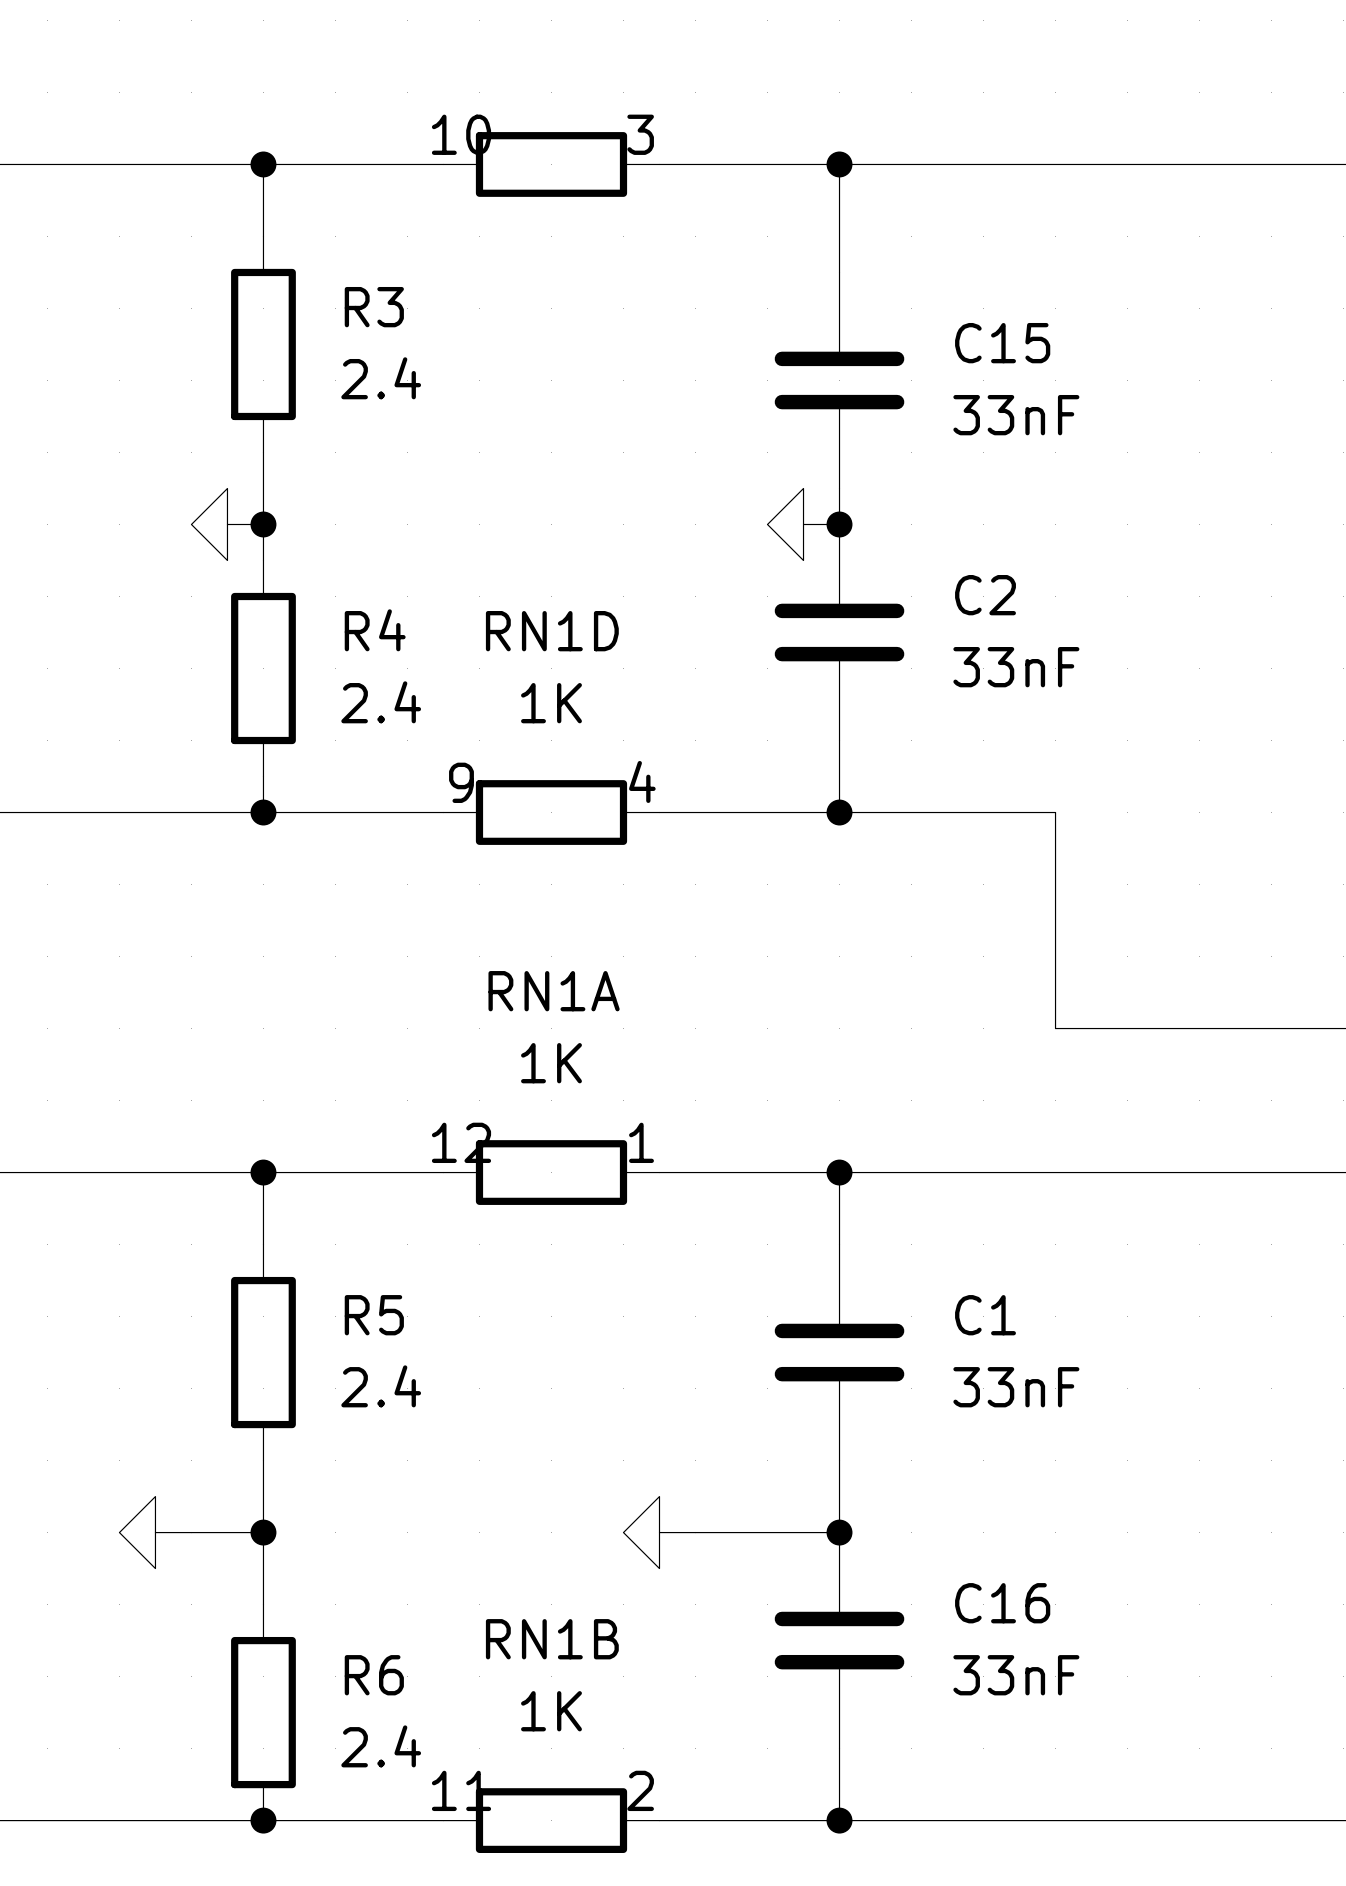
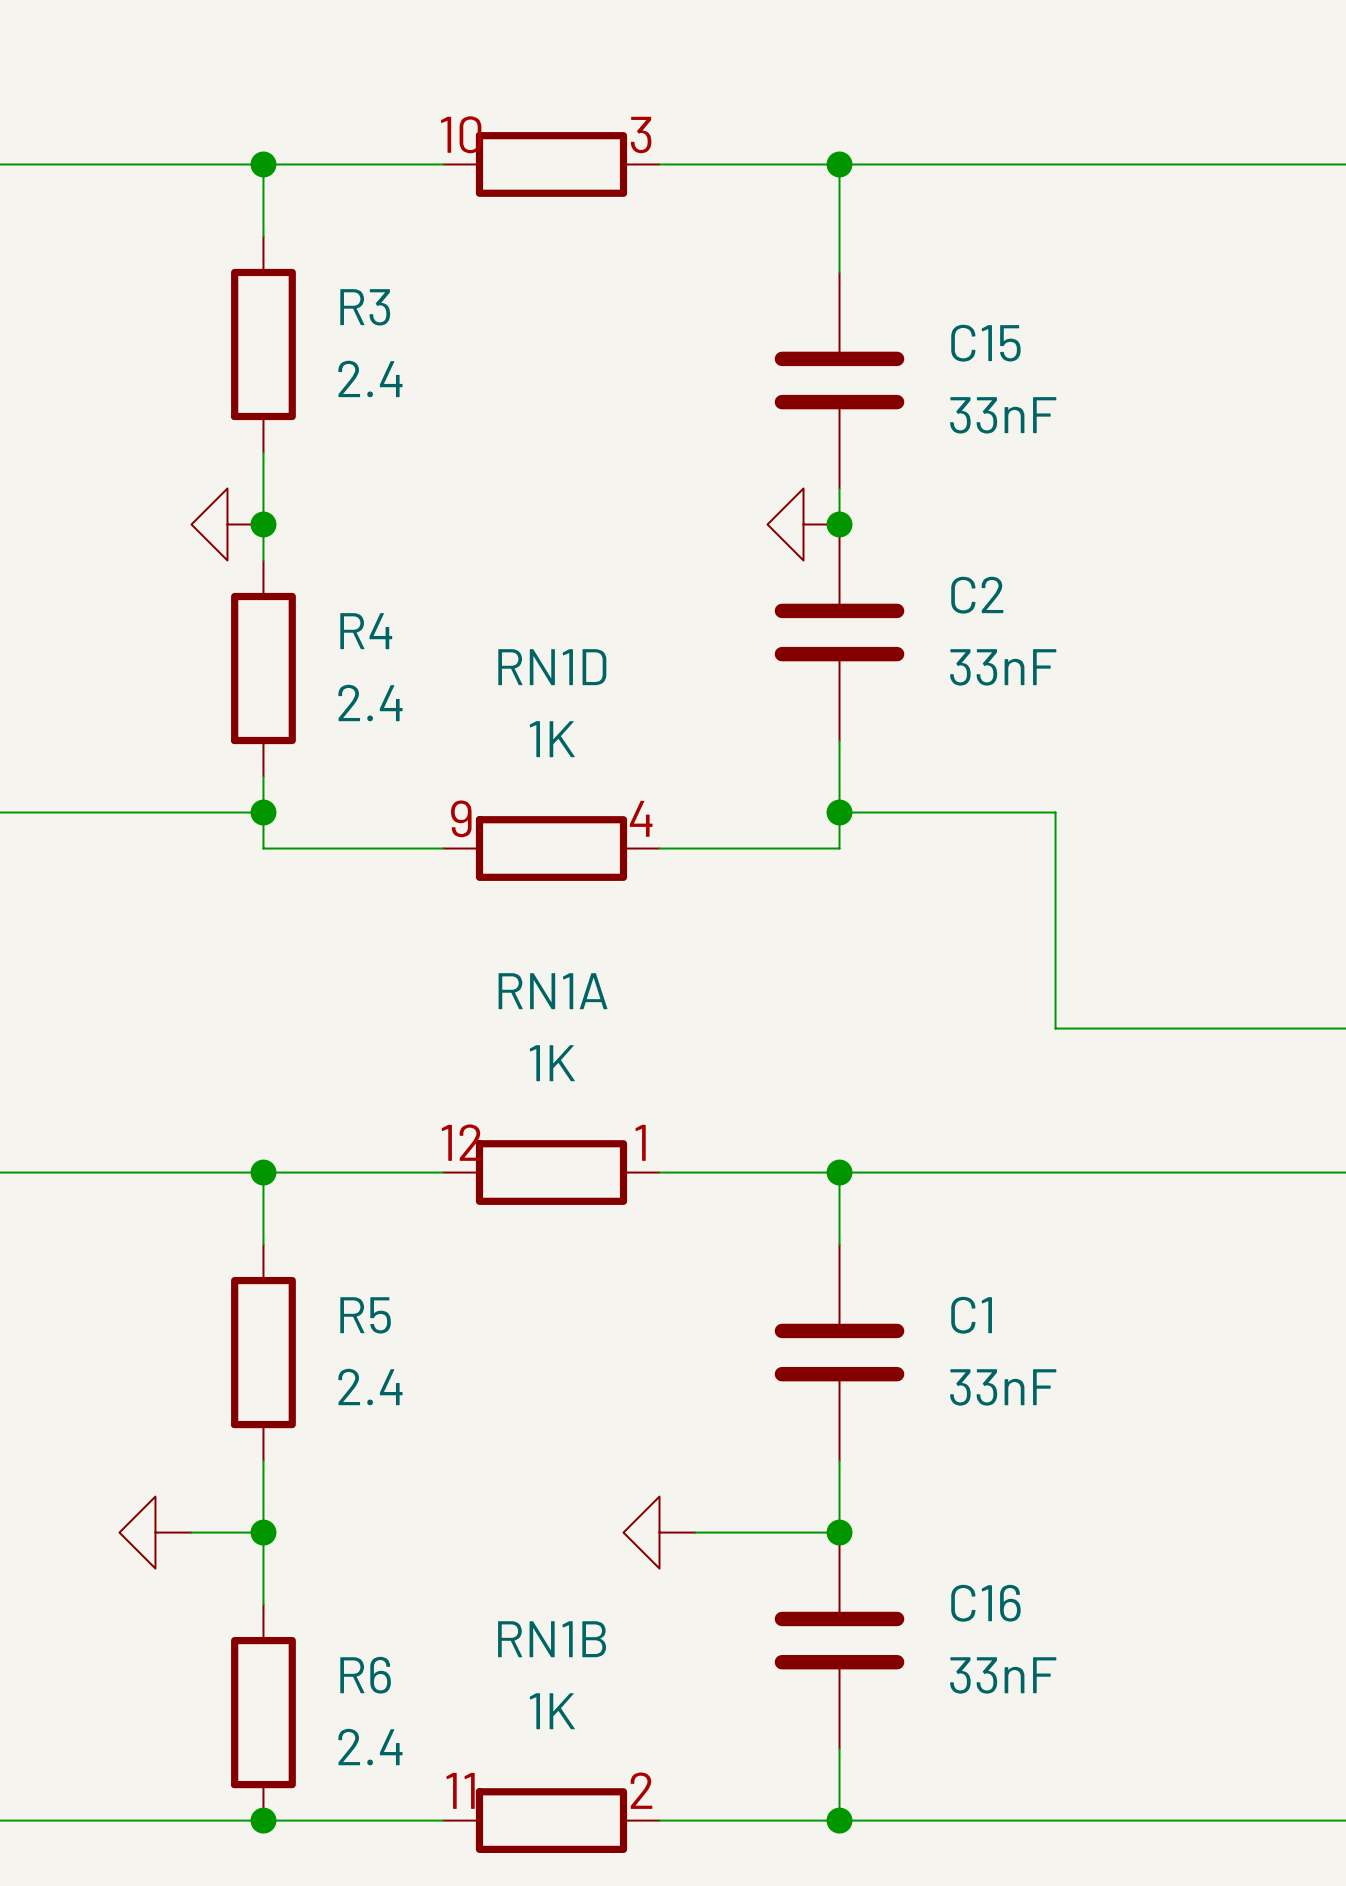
wire: (263, 812) (443, 812) -> (263, 812) (263, 848) (443, 848)
RN1D position: (551, 812) -> (551, 848)
wire: (659, 812) (839, 812) -> (659, 848) (839, 848) (839, 812)

